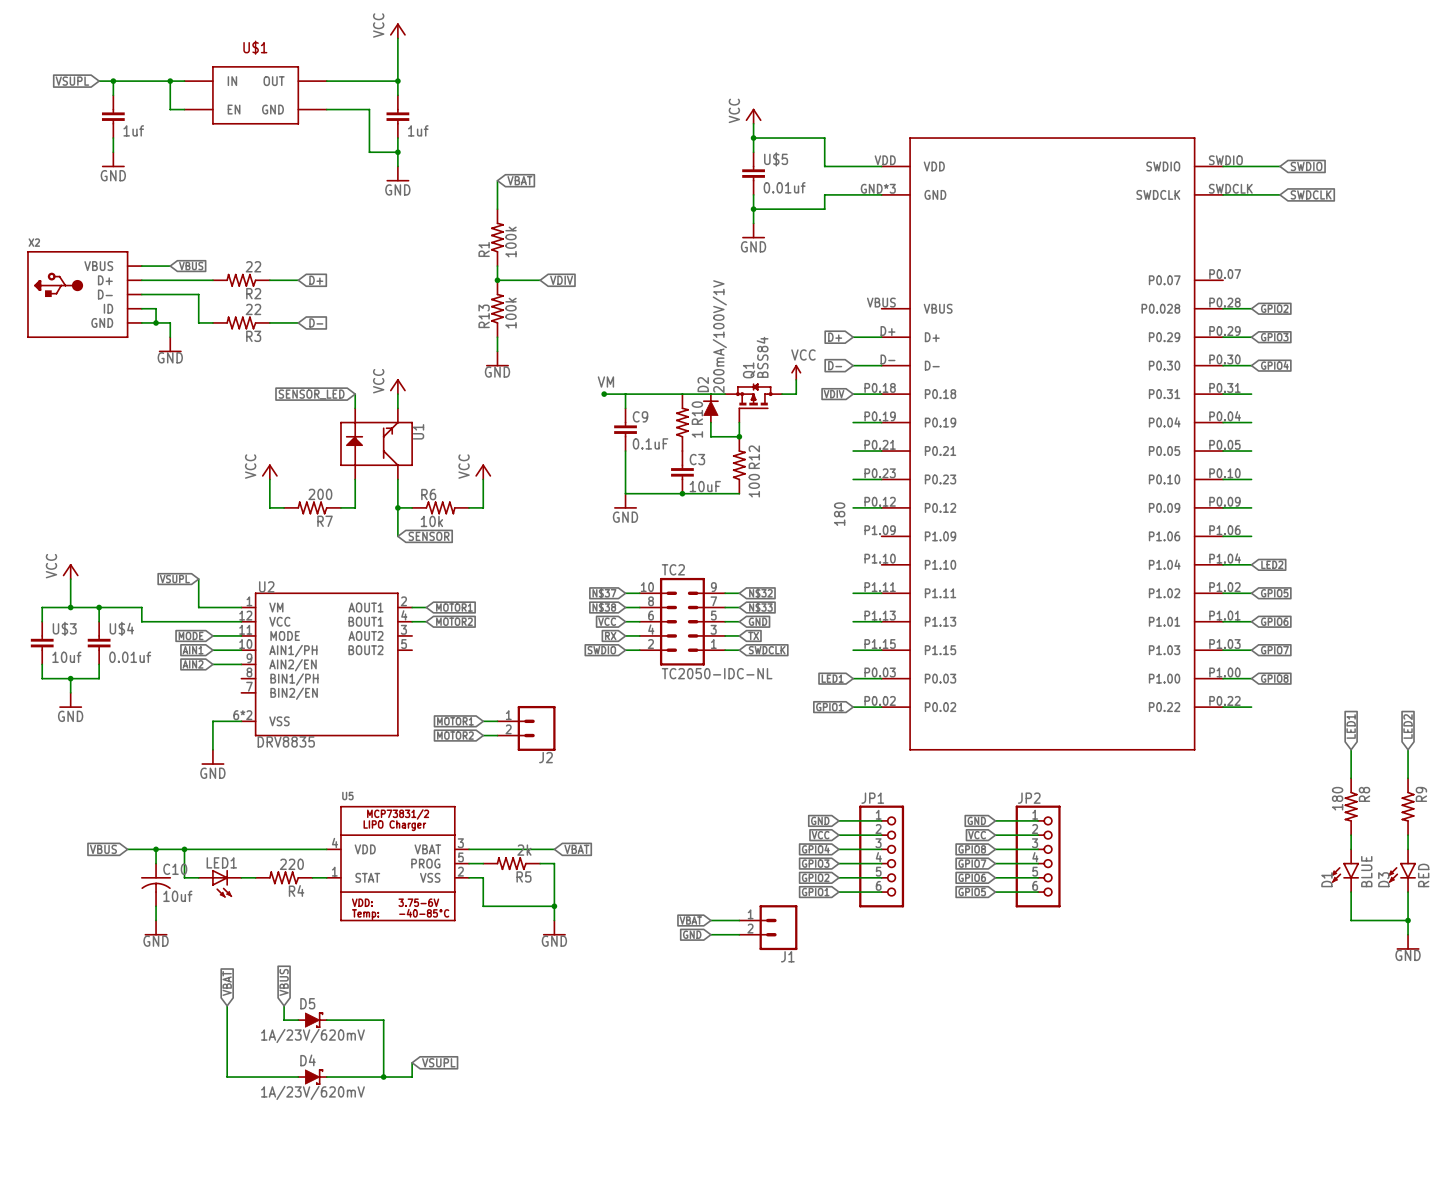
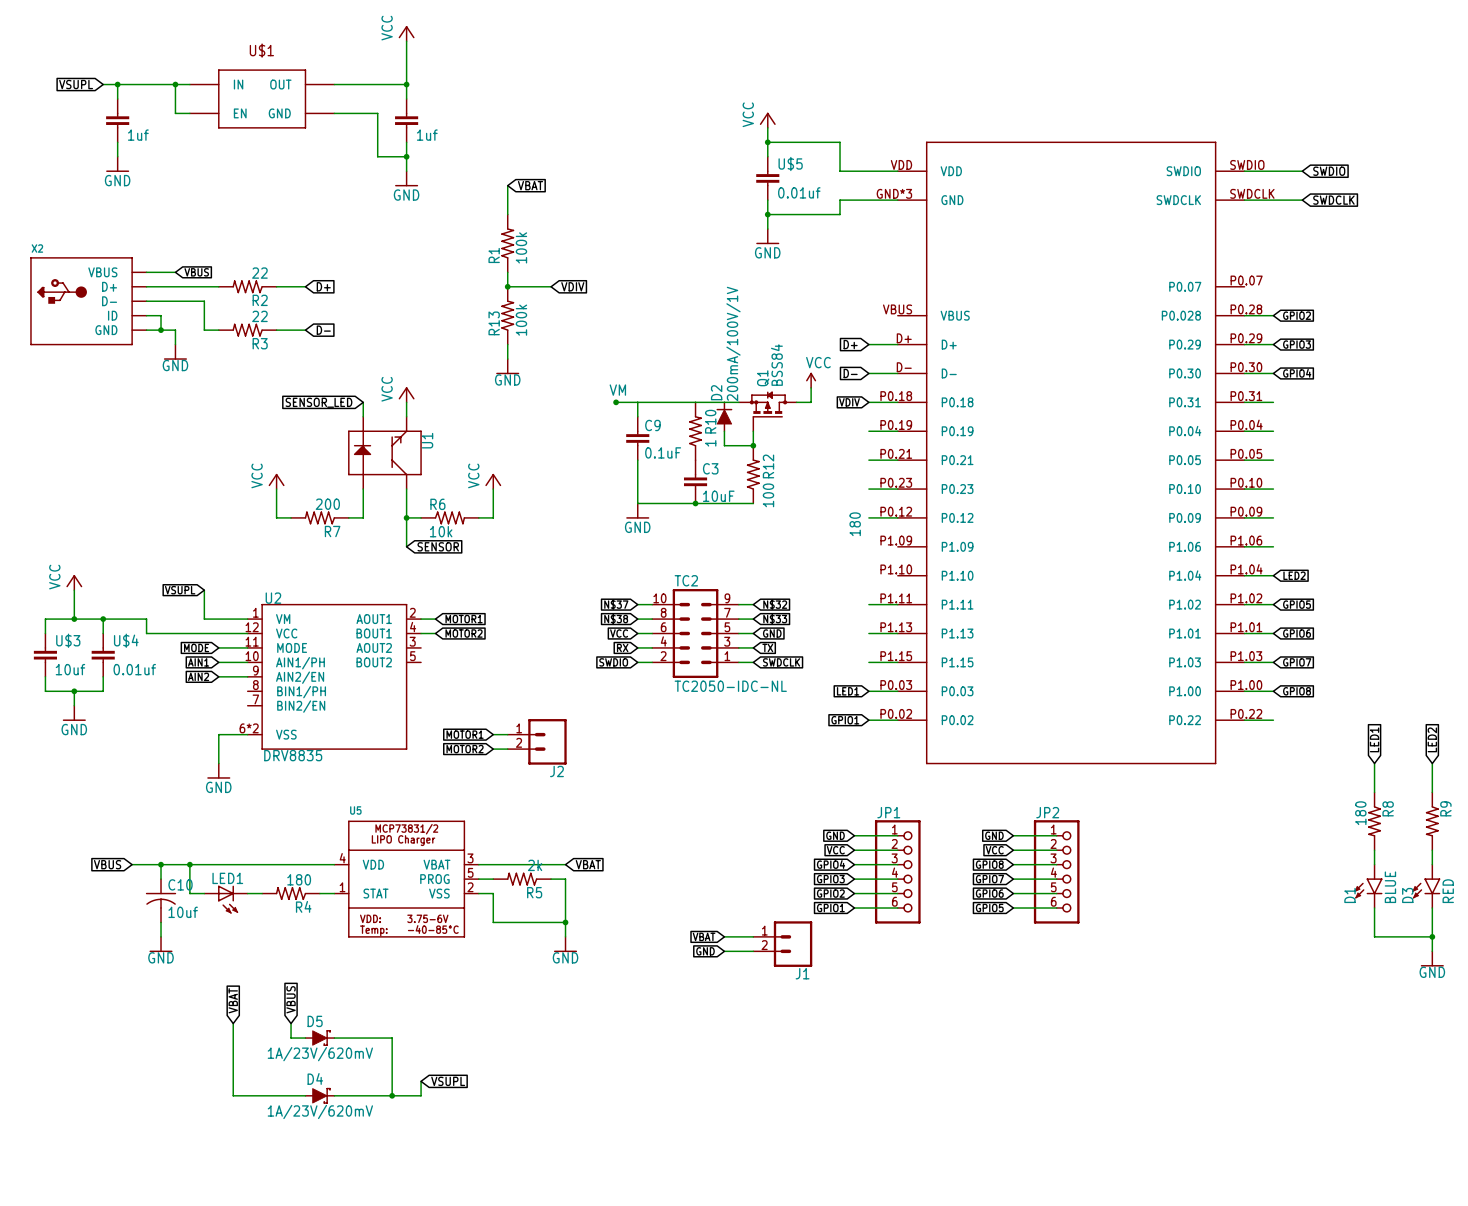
R4 value: 220 (291, 864) -> 180 (299, 879)

